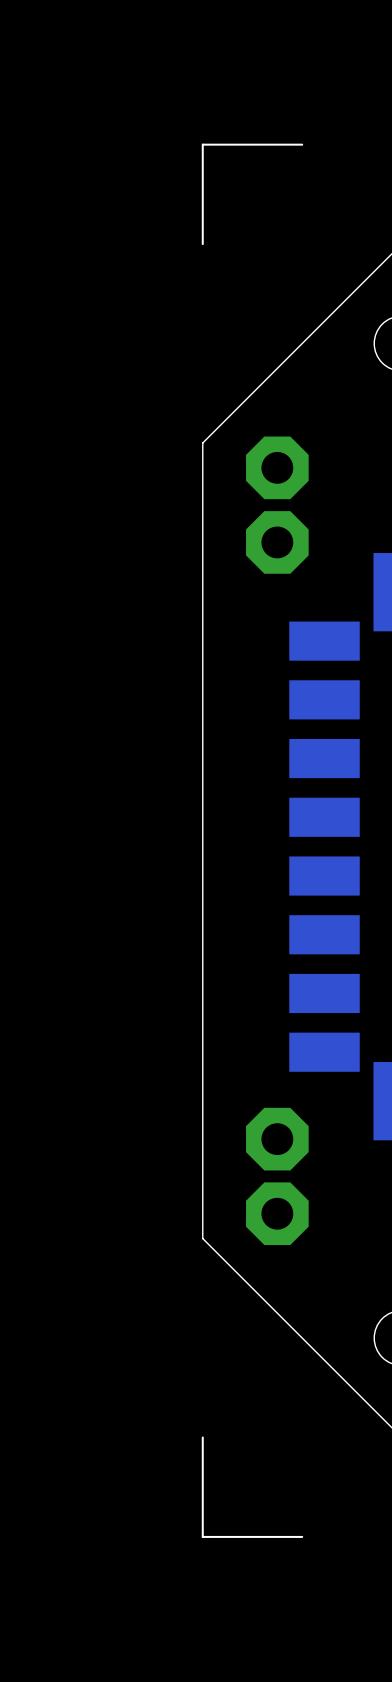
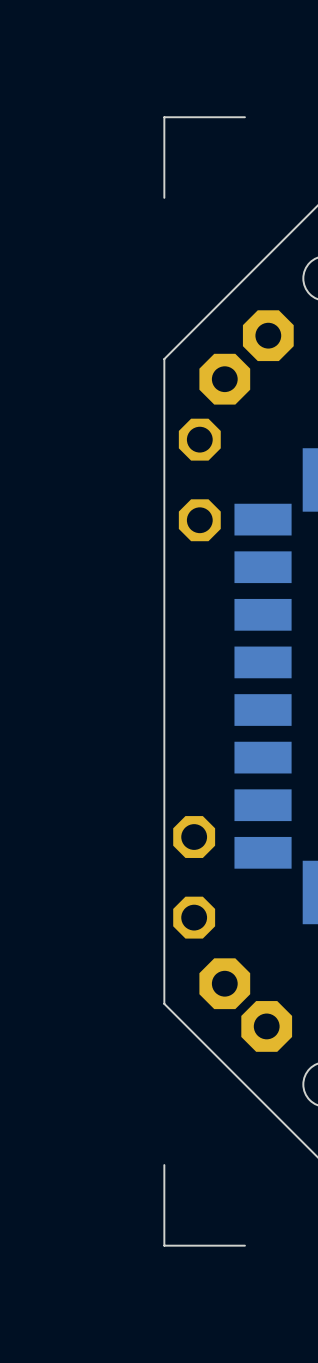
part position: (277, 542) -> (268, 335)
part: none -> (199, 479)
part: none -> (194, 877)
part position: (277, 1139) -> (266, 1026)

